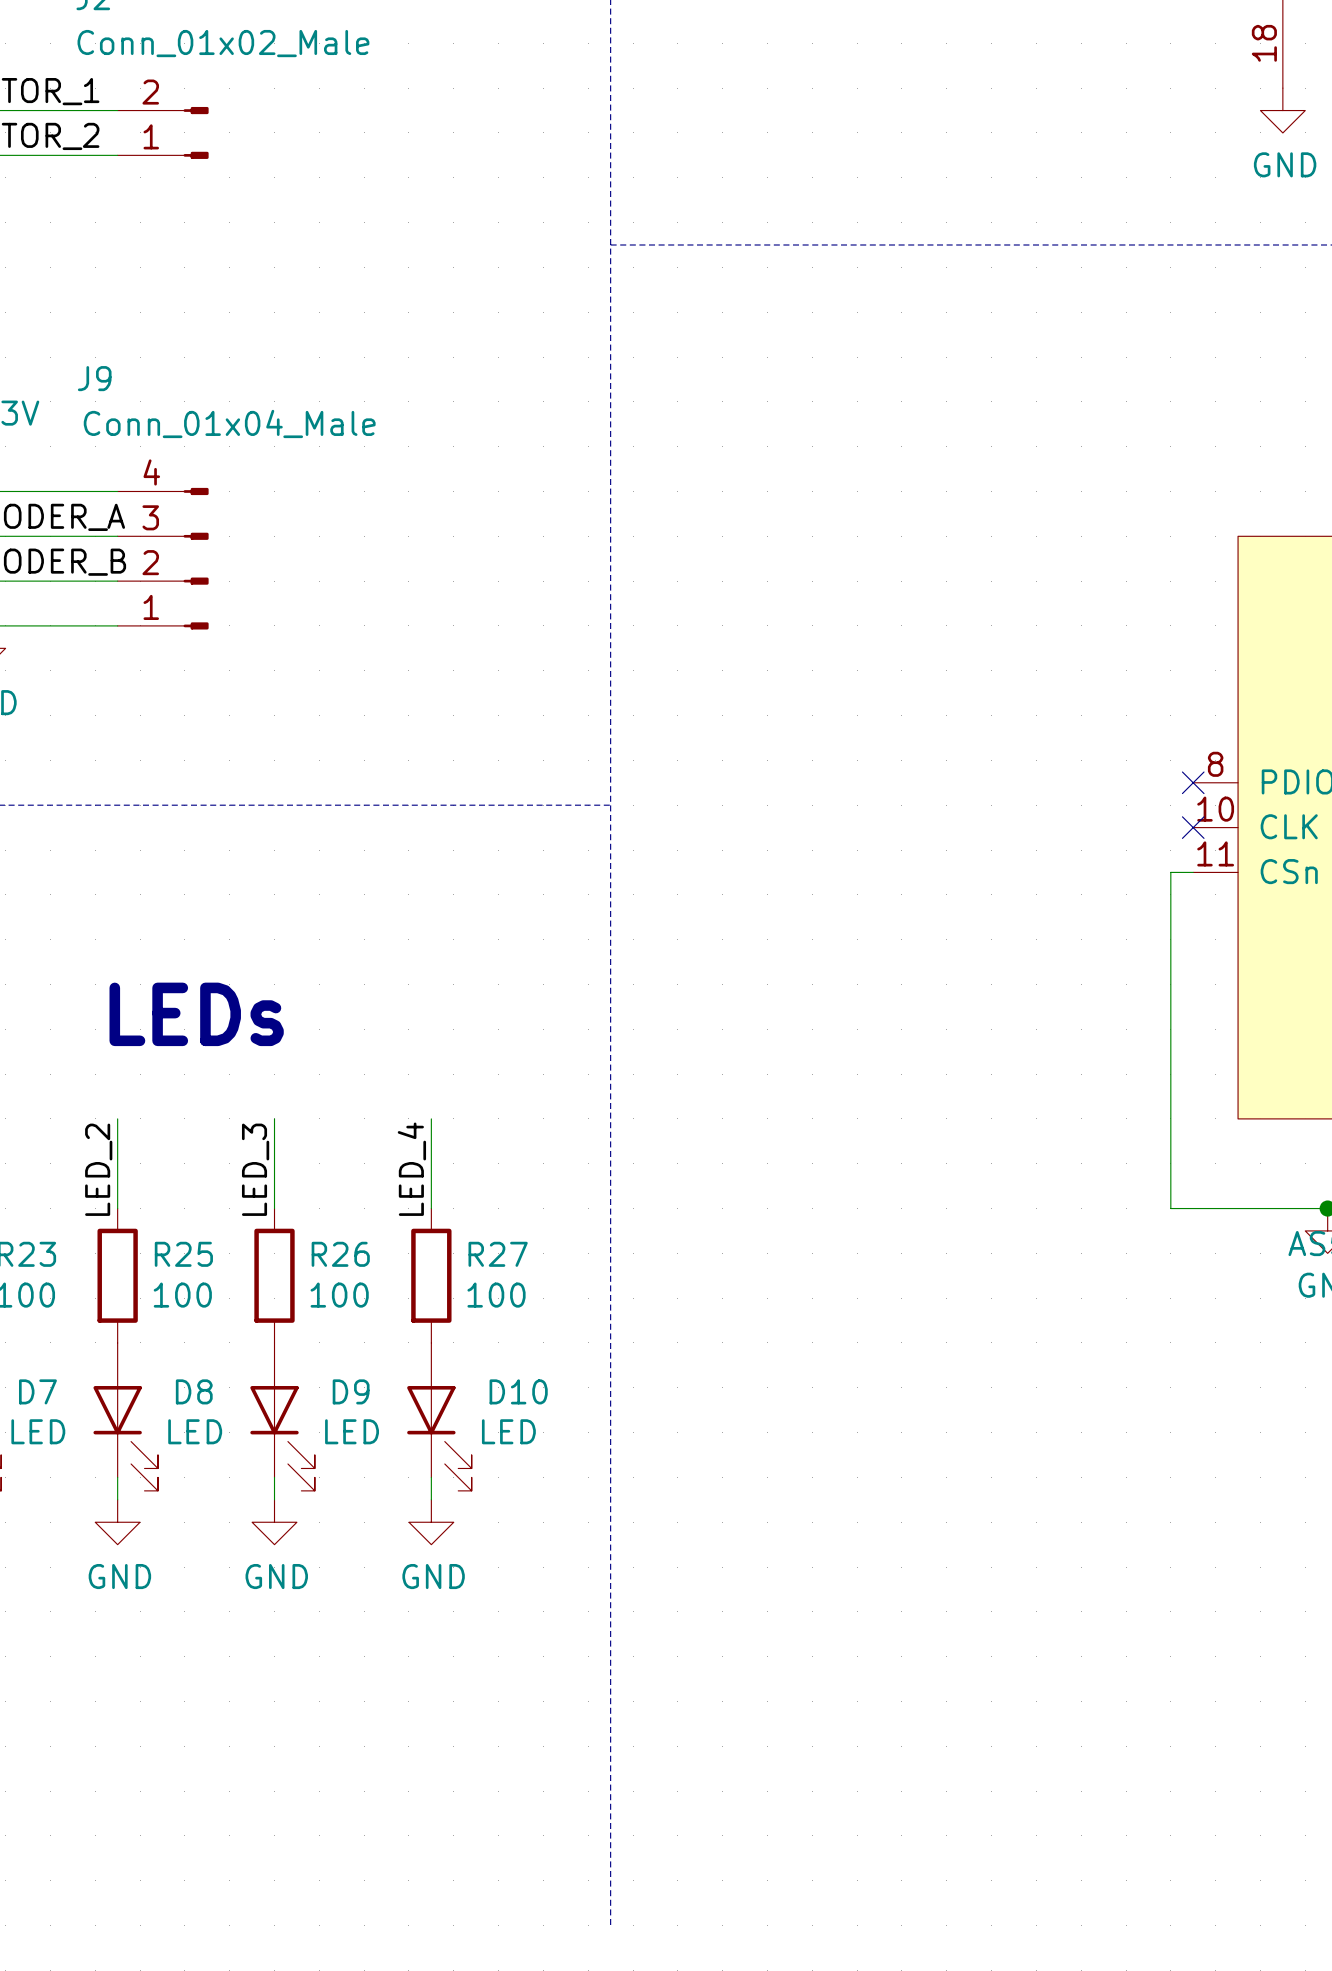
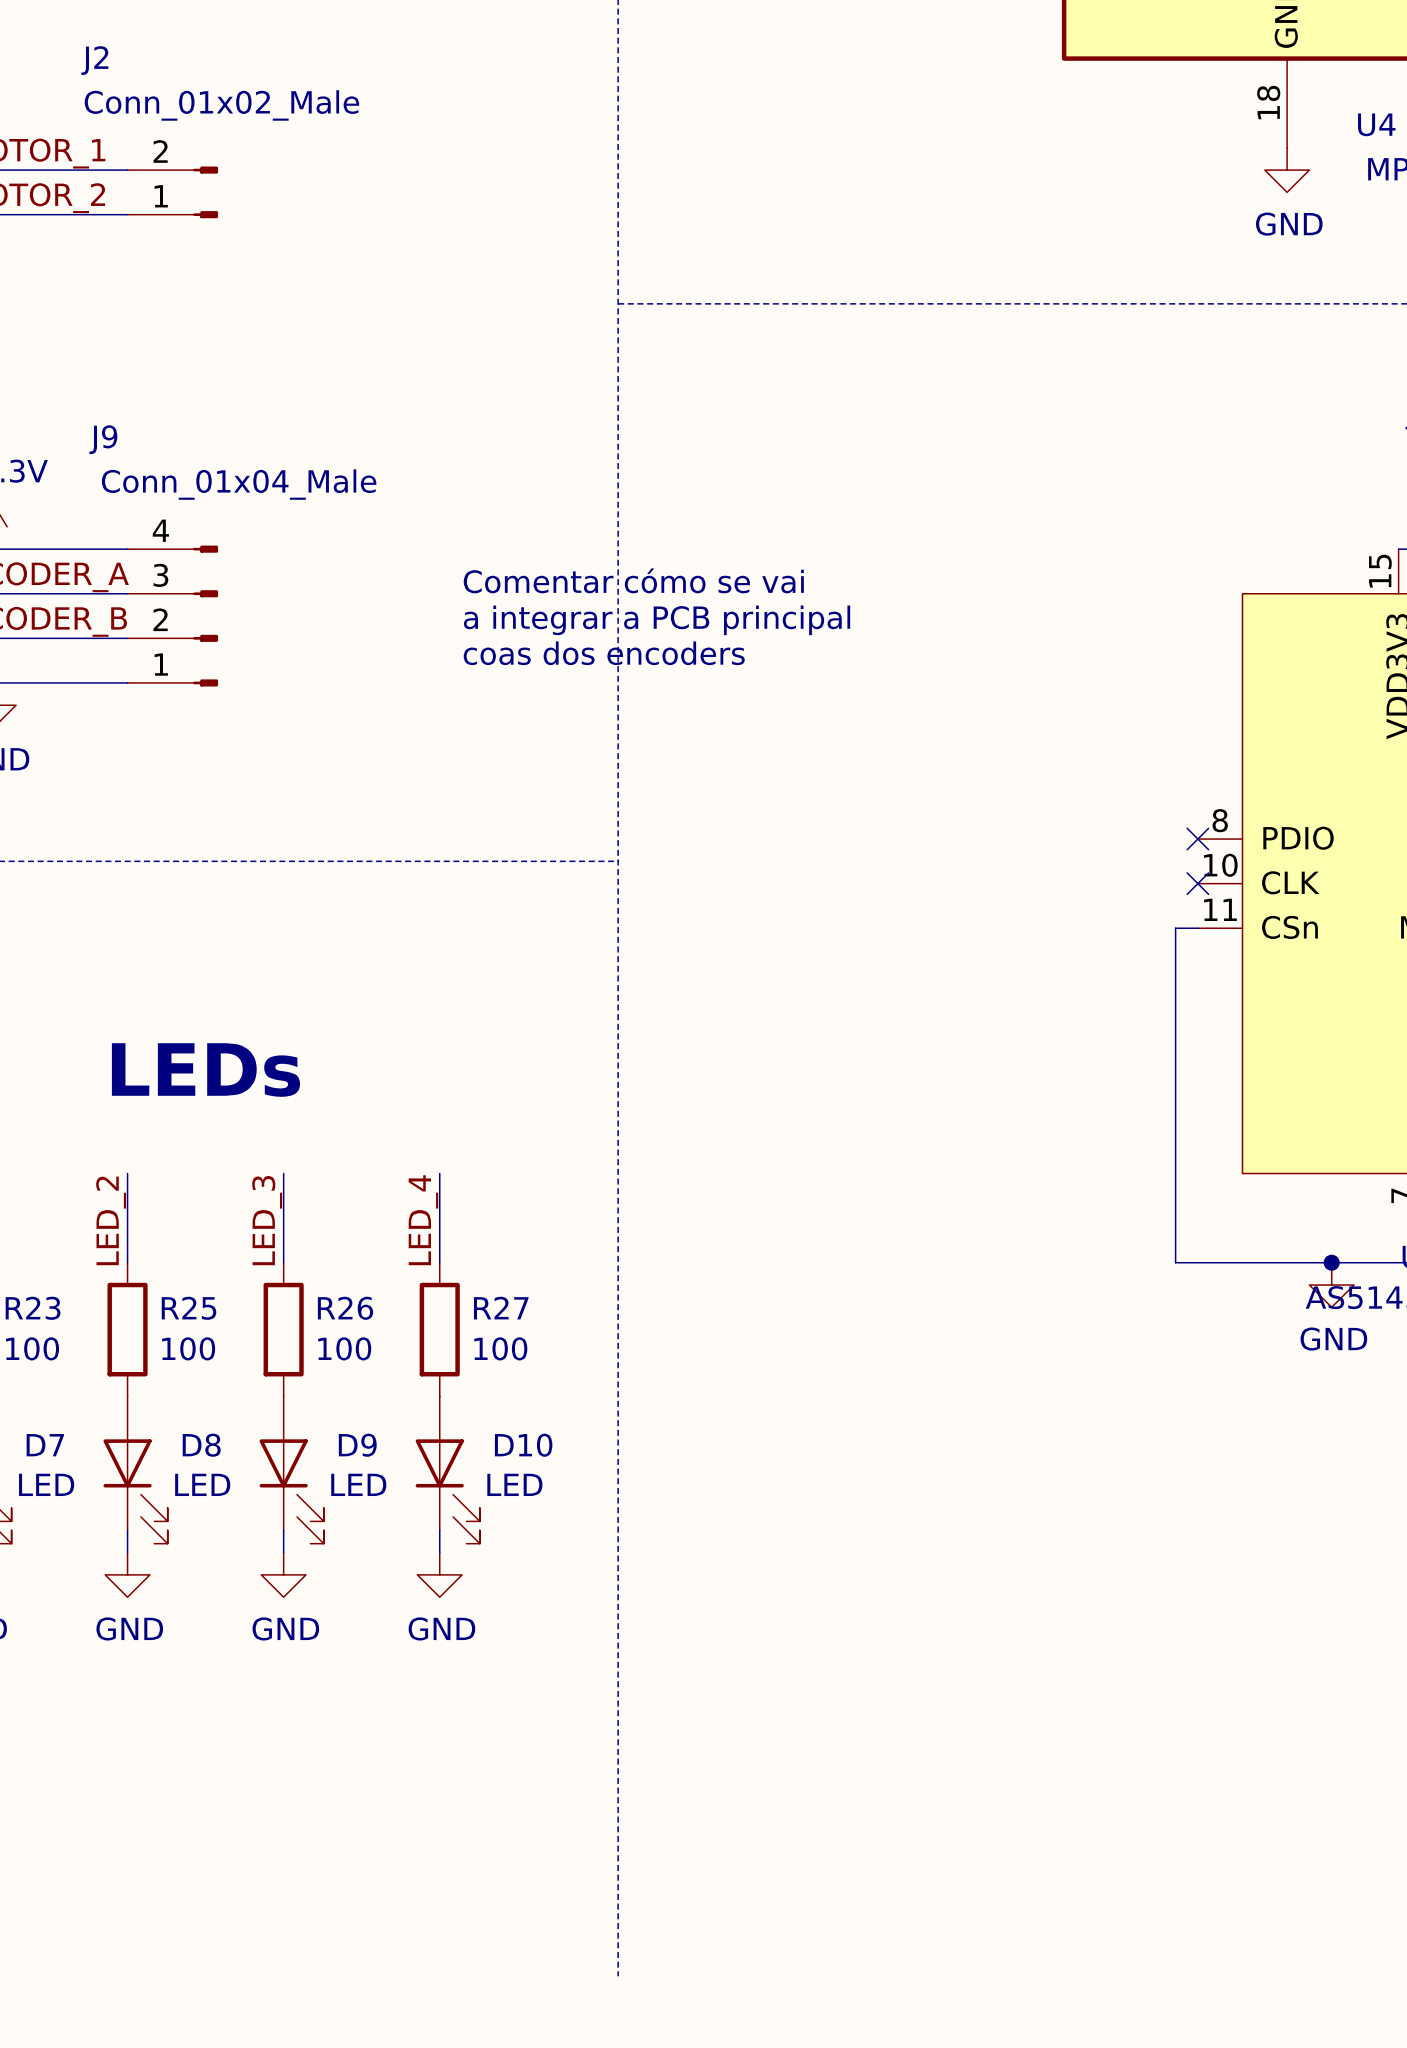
text: none -> Comentar cómo se vai (633, 580)
text: none -> a integrar a PCB principal (657, 620)
text: none -> coas dos encoders (604, 653)

